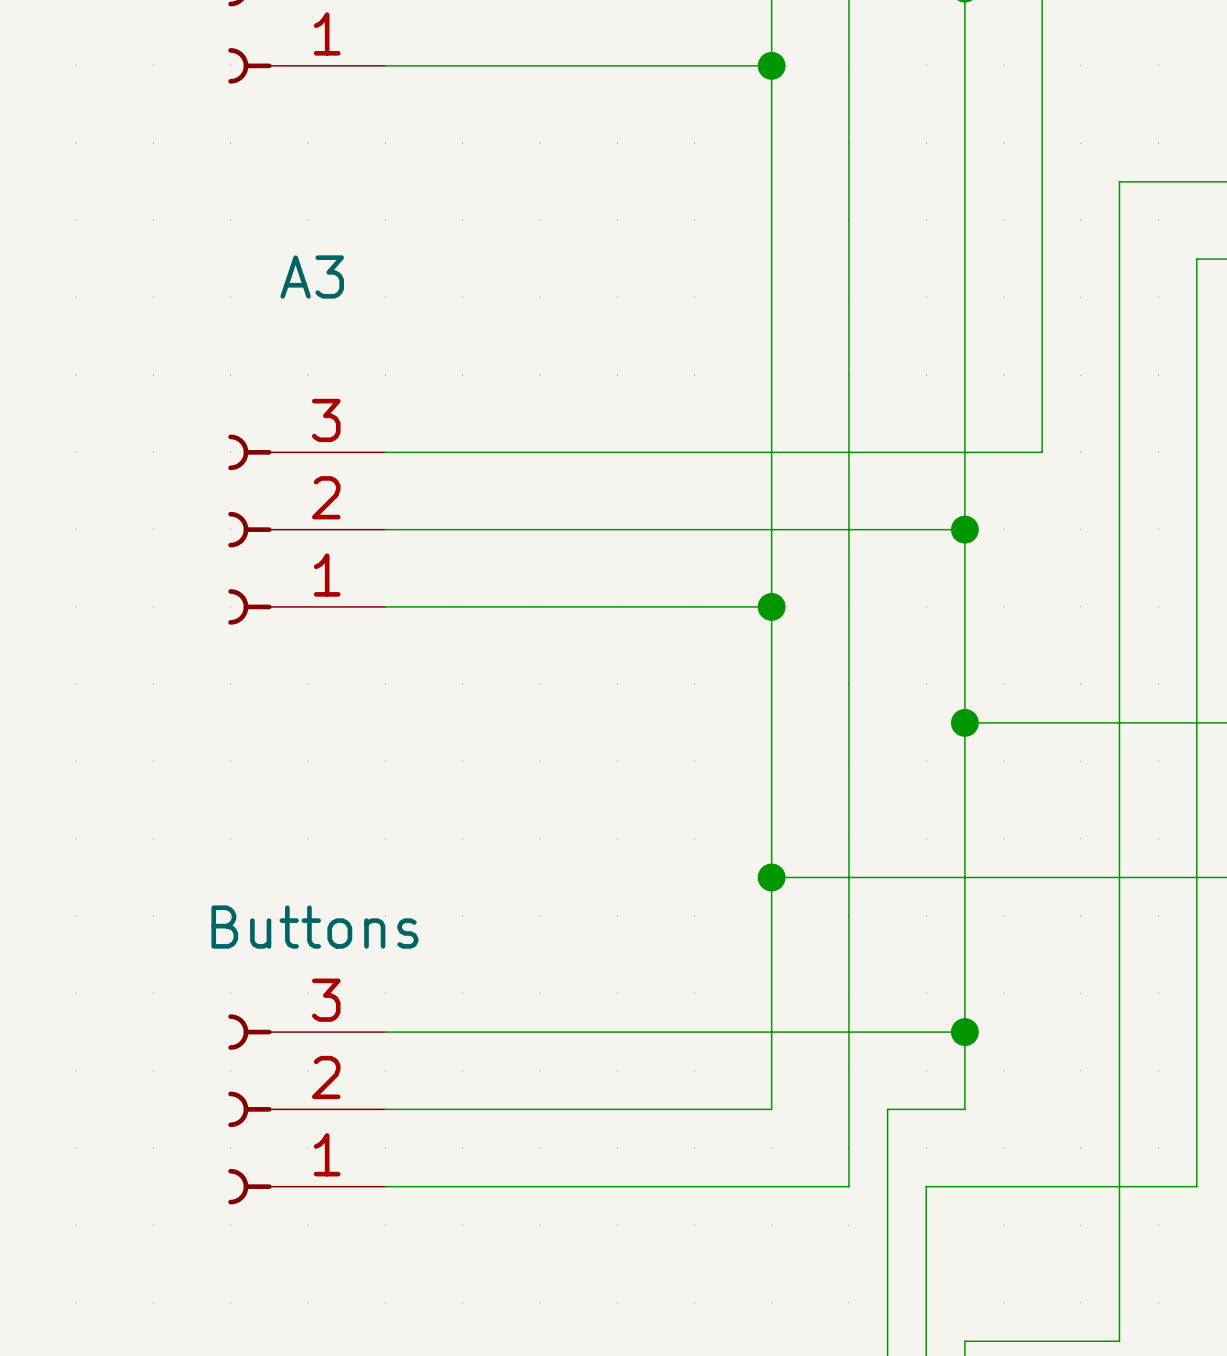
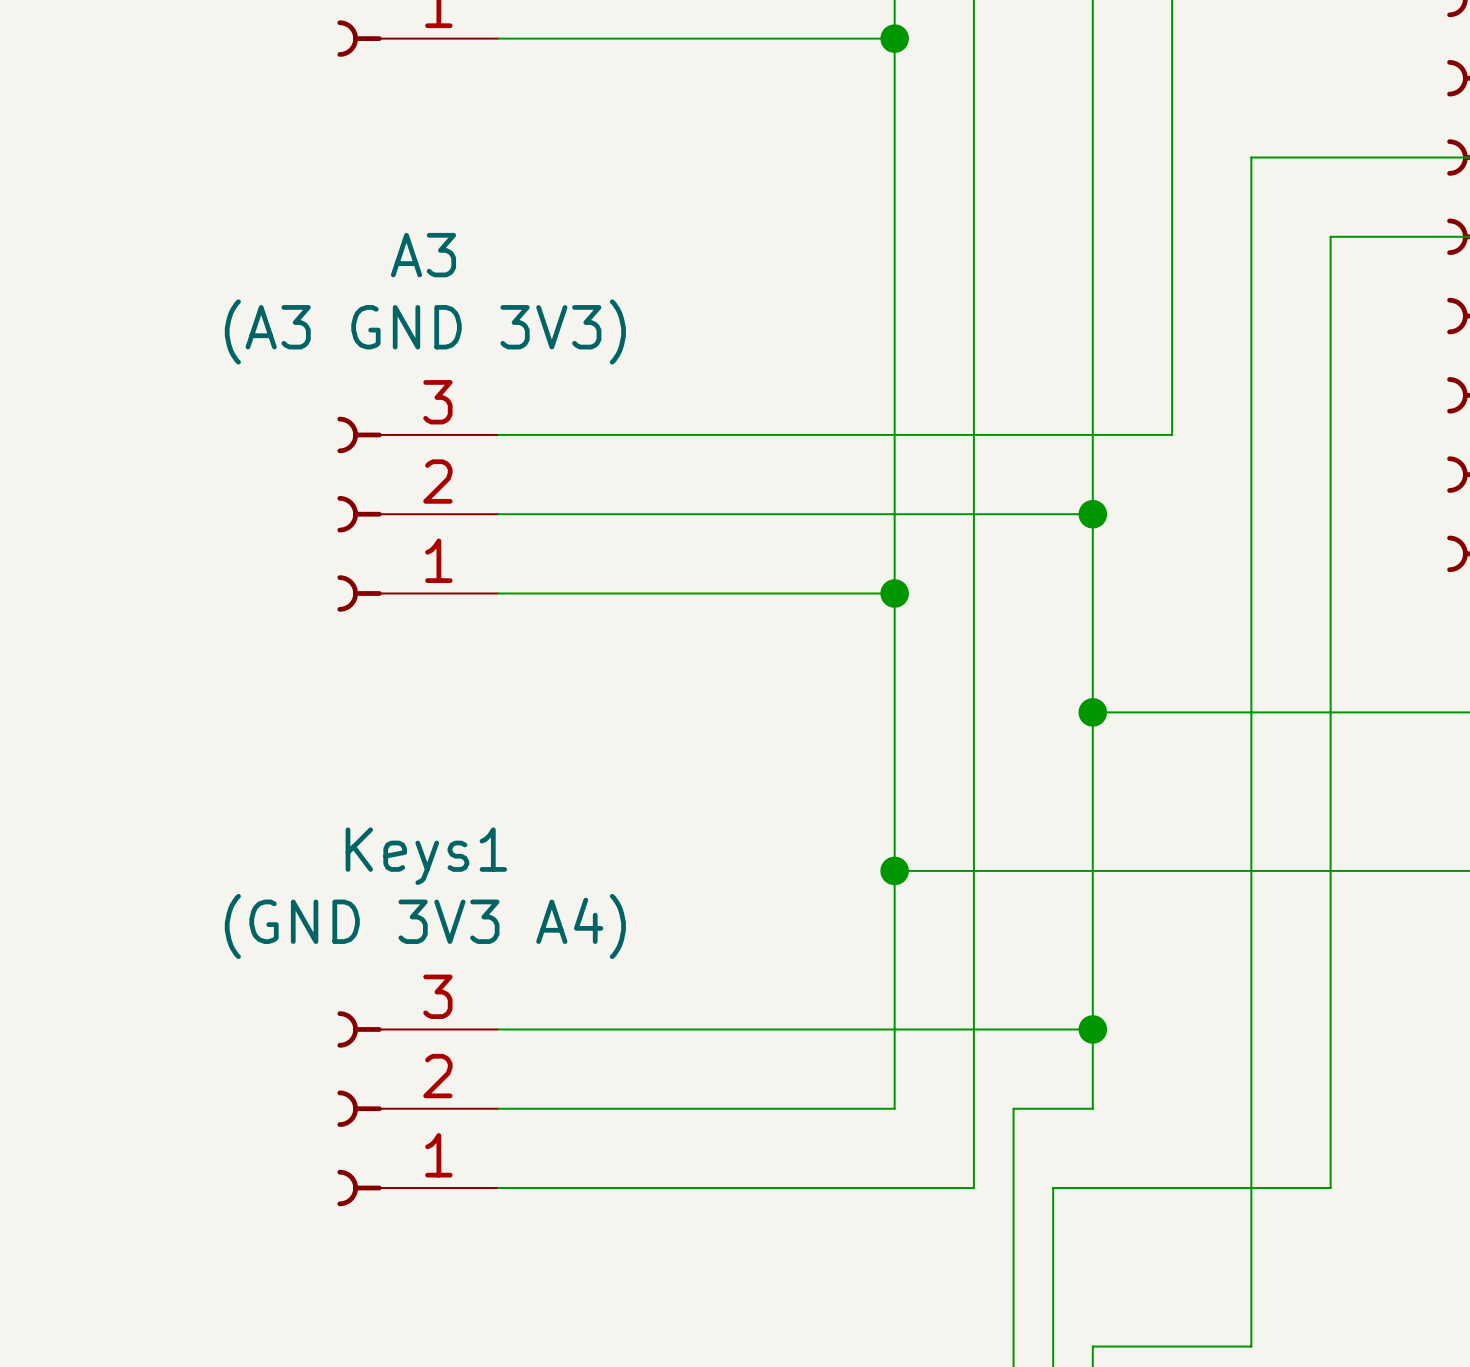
A3 value: none -> (A3 GND 3V3) (425, 331)
Keys1 name: none -> Keys1 (426, 856)
Keys1 value: Buttons (314, 927) -> (GND 3V3 A4) (425, 926)

